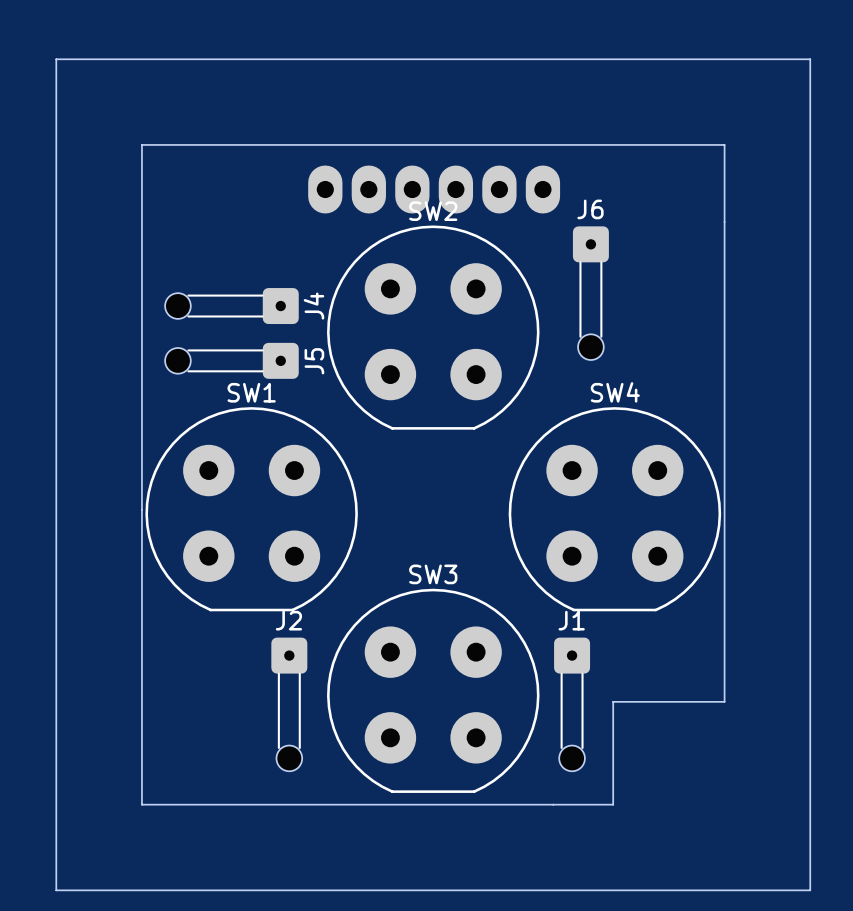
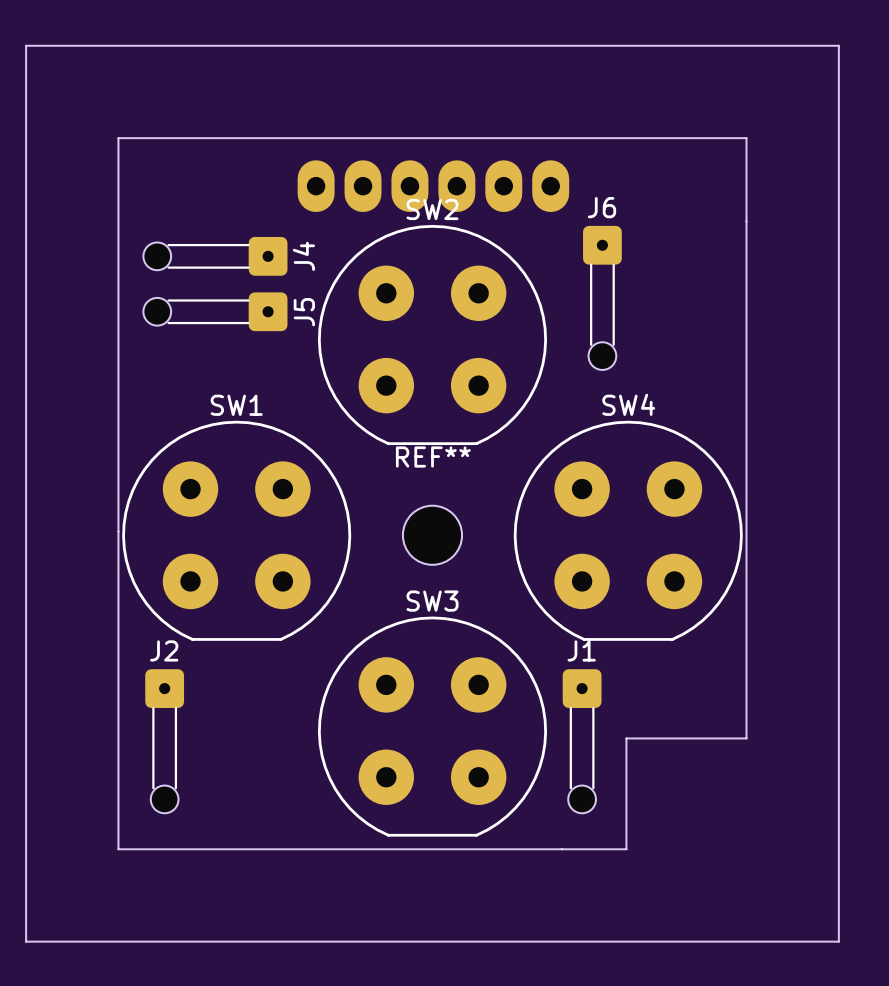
J4: none -> (215, 256)
J4 name: J4 (313, 306) -> J5 (304, 312)
J5: (231, 360) -> none
REF**: none -> (432, 535)
J2 position: (289, 704) -> (164, 741)

